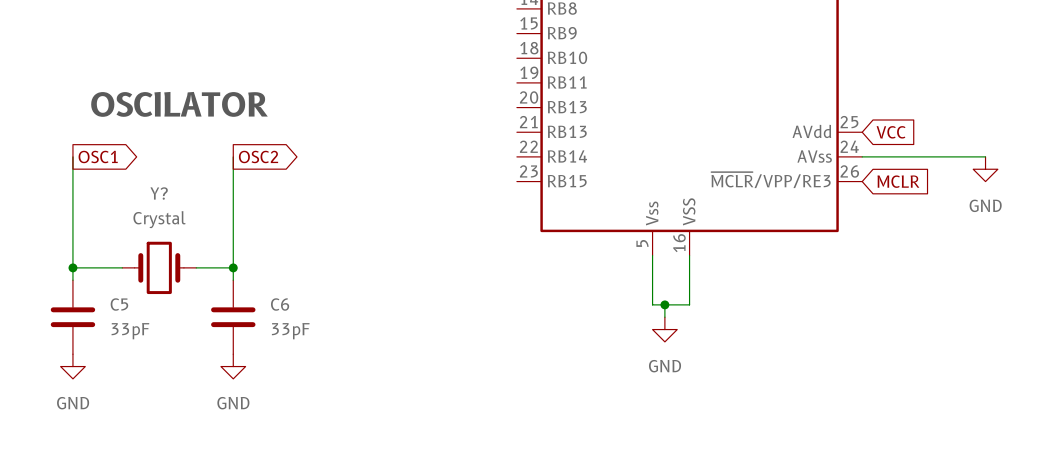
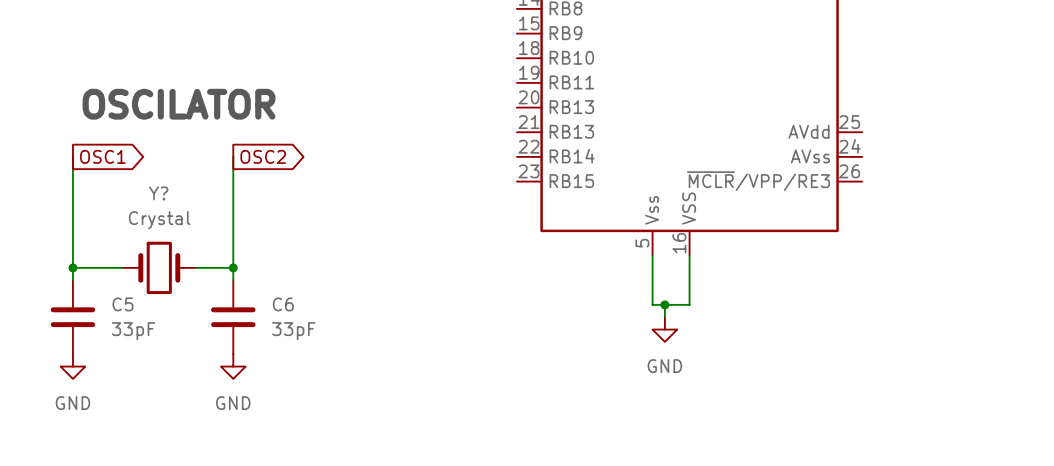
global label: VCC (891, 132) -> none
wire: (862, 156) (985, 156) -> none
power symbol: GND (985, 169) -> none
global label: MCLR (898, 181) -> none

